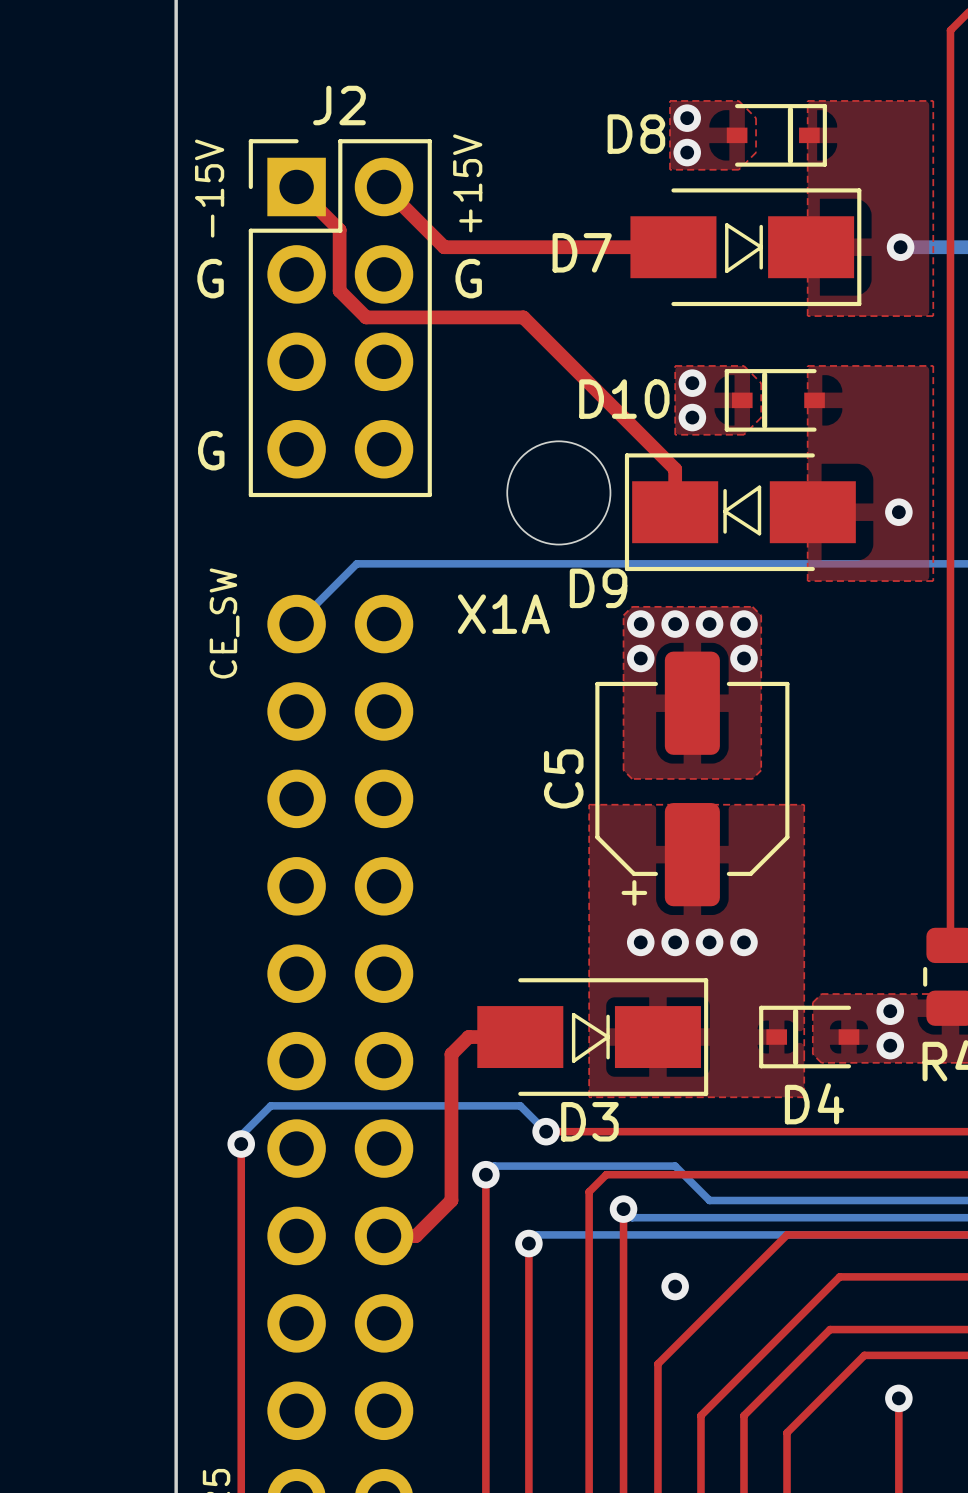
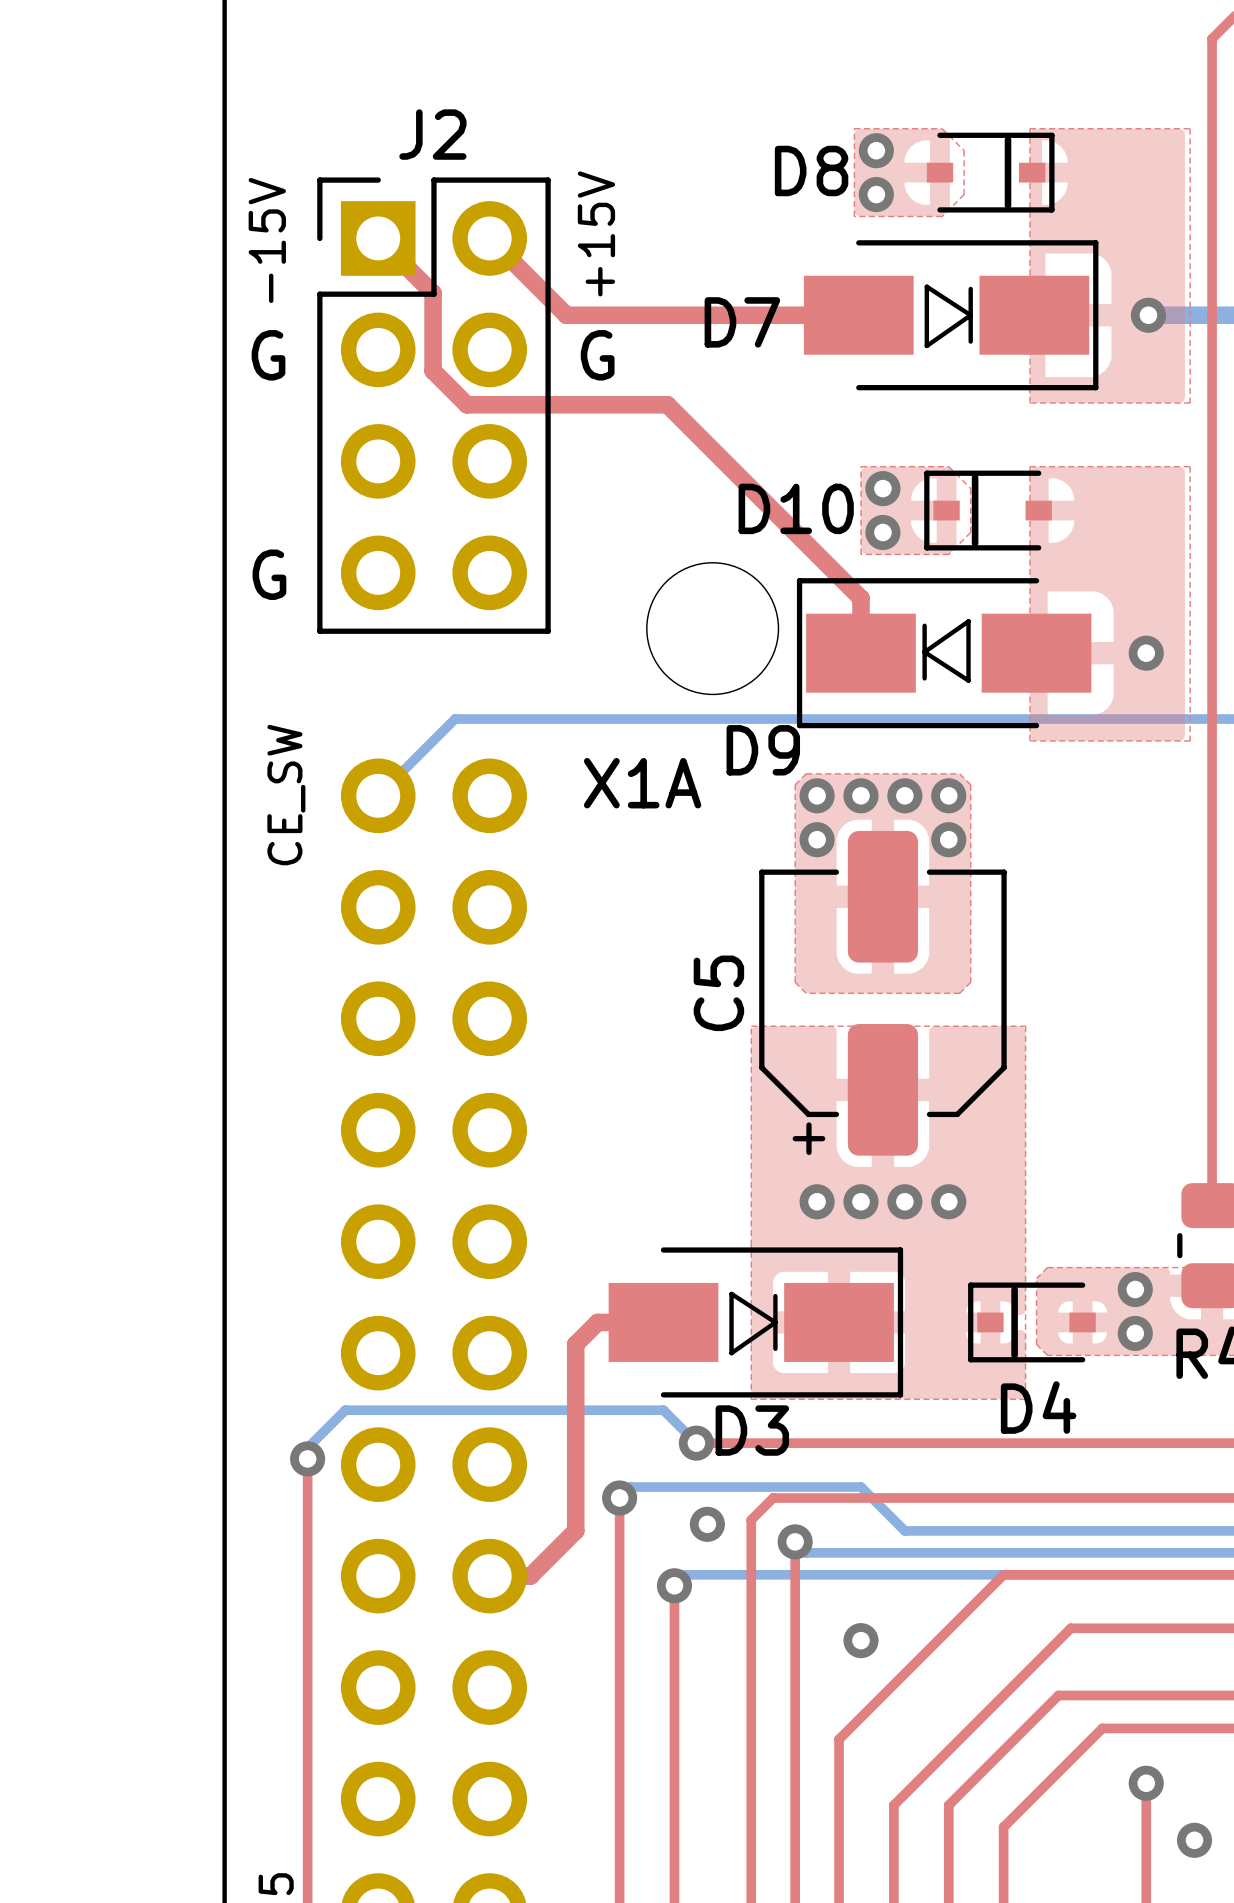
via: none -> (707, 1524)
via: none -> (1194, 1840)

